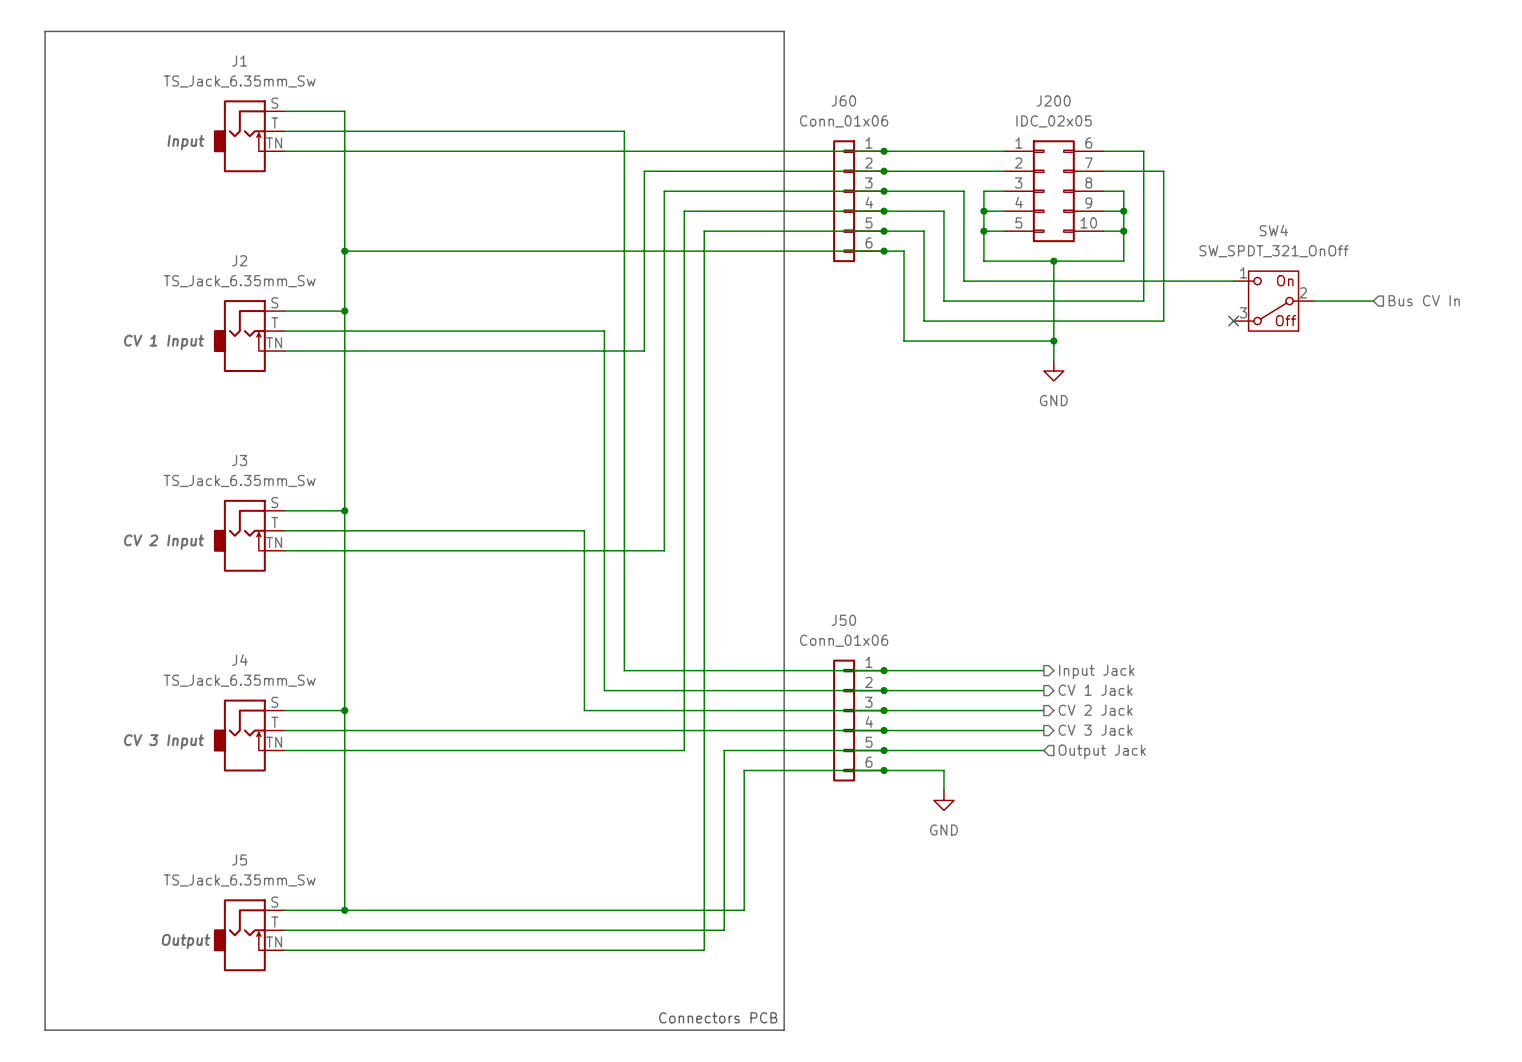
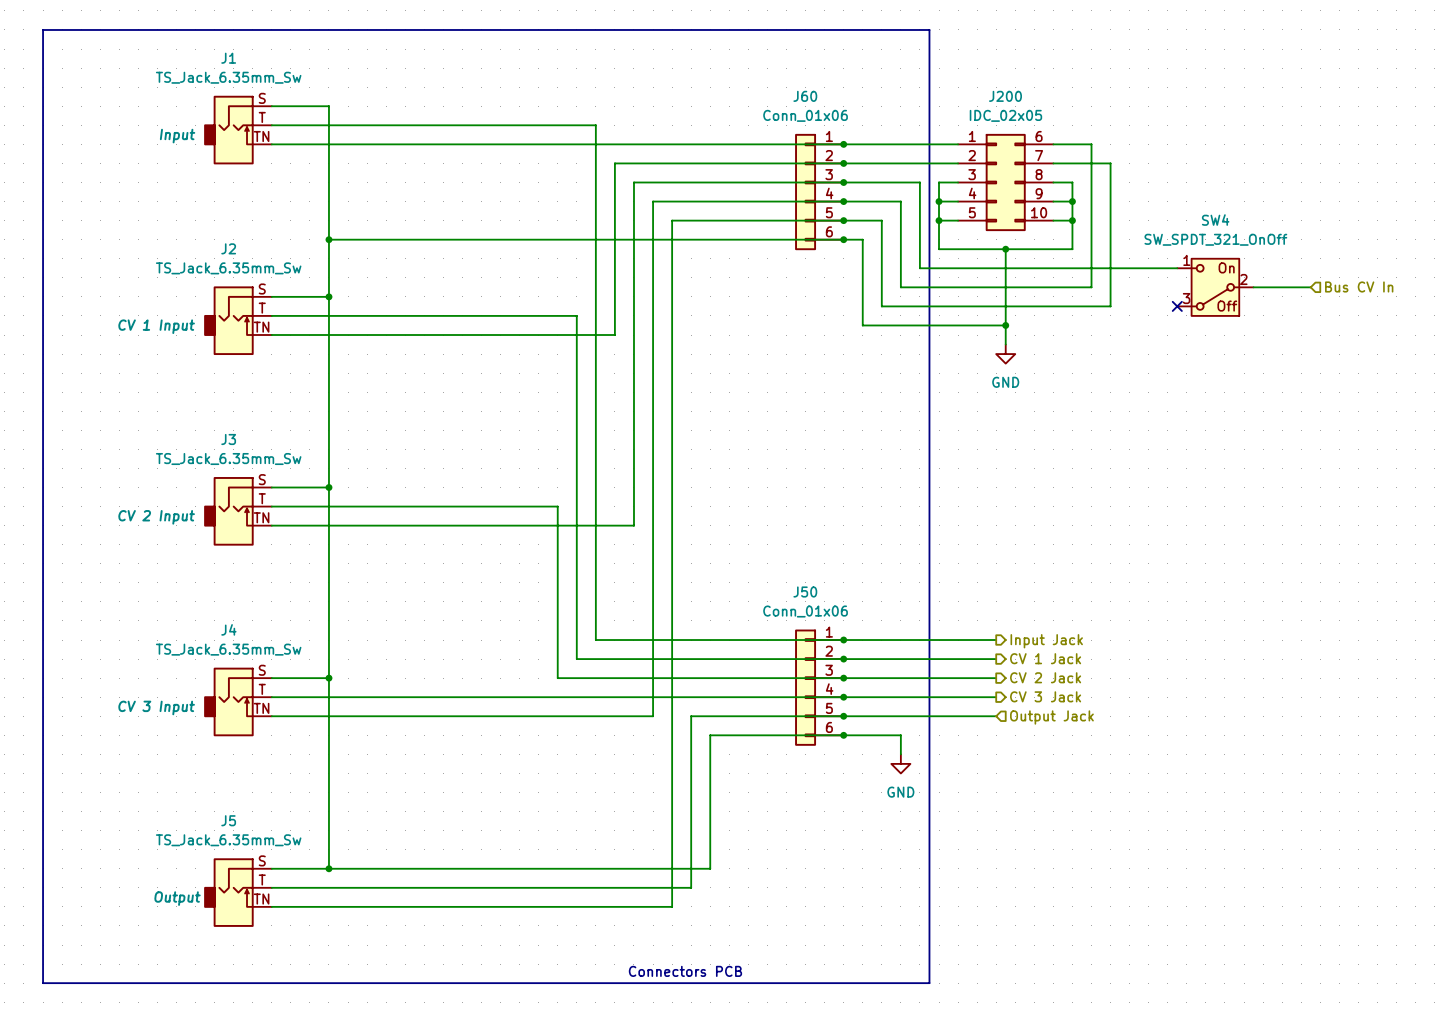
line: (784, 31) (784, 1030) -> (748, 29) (929, 29) (929, 983) (748, 983)

